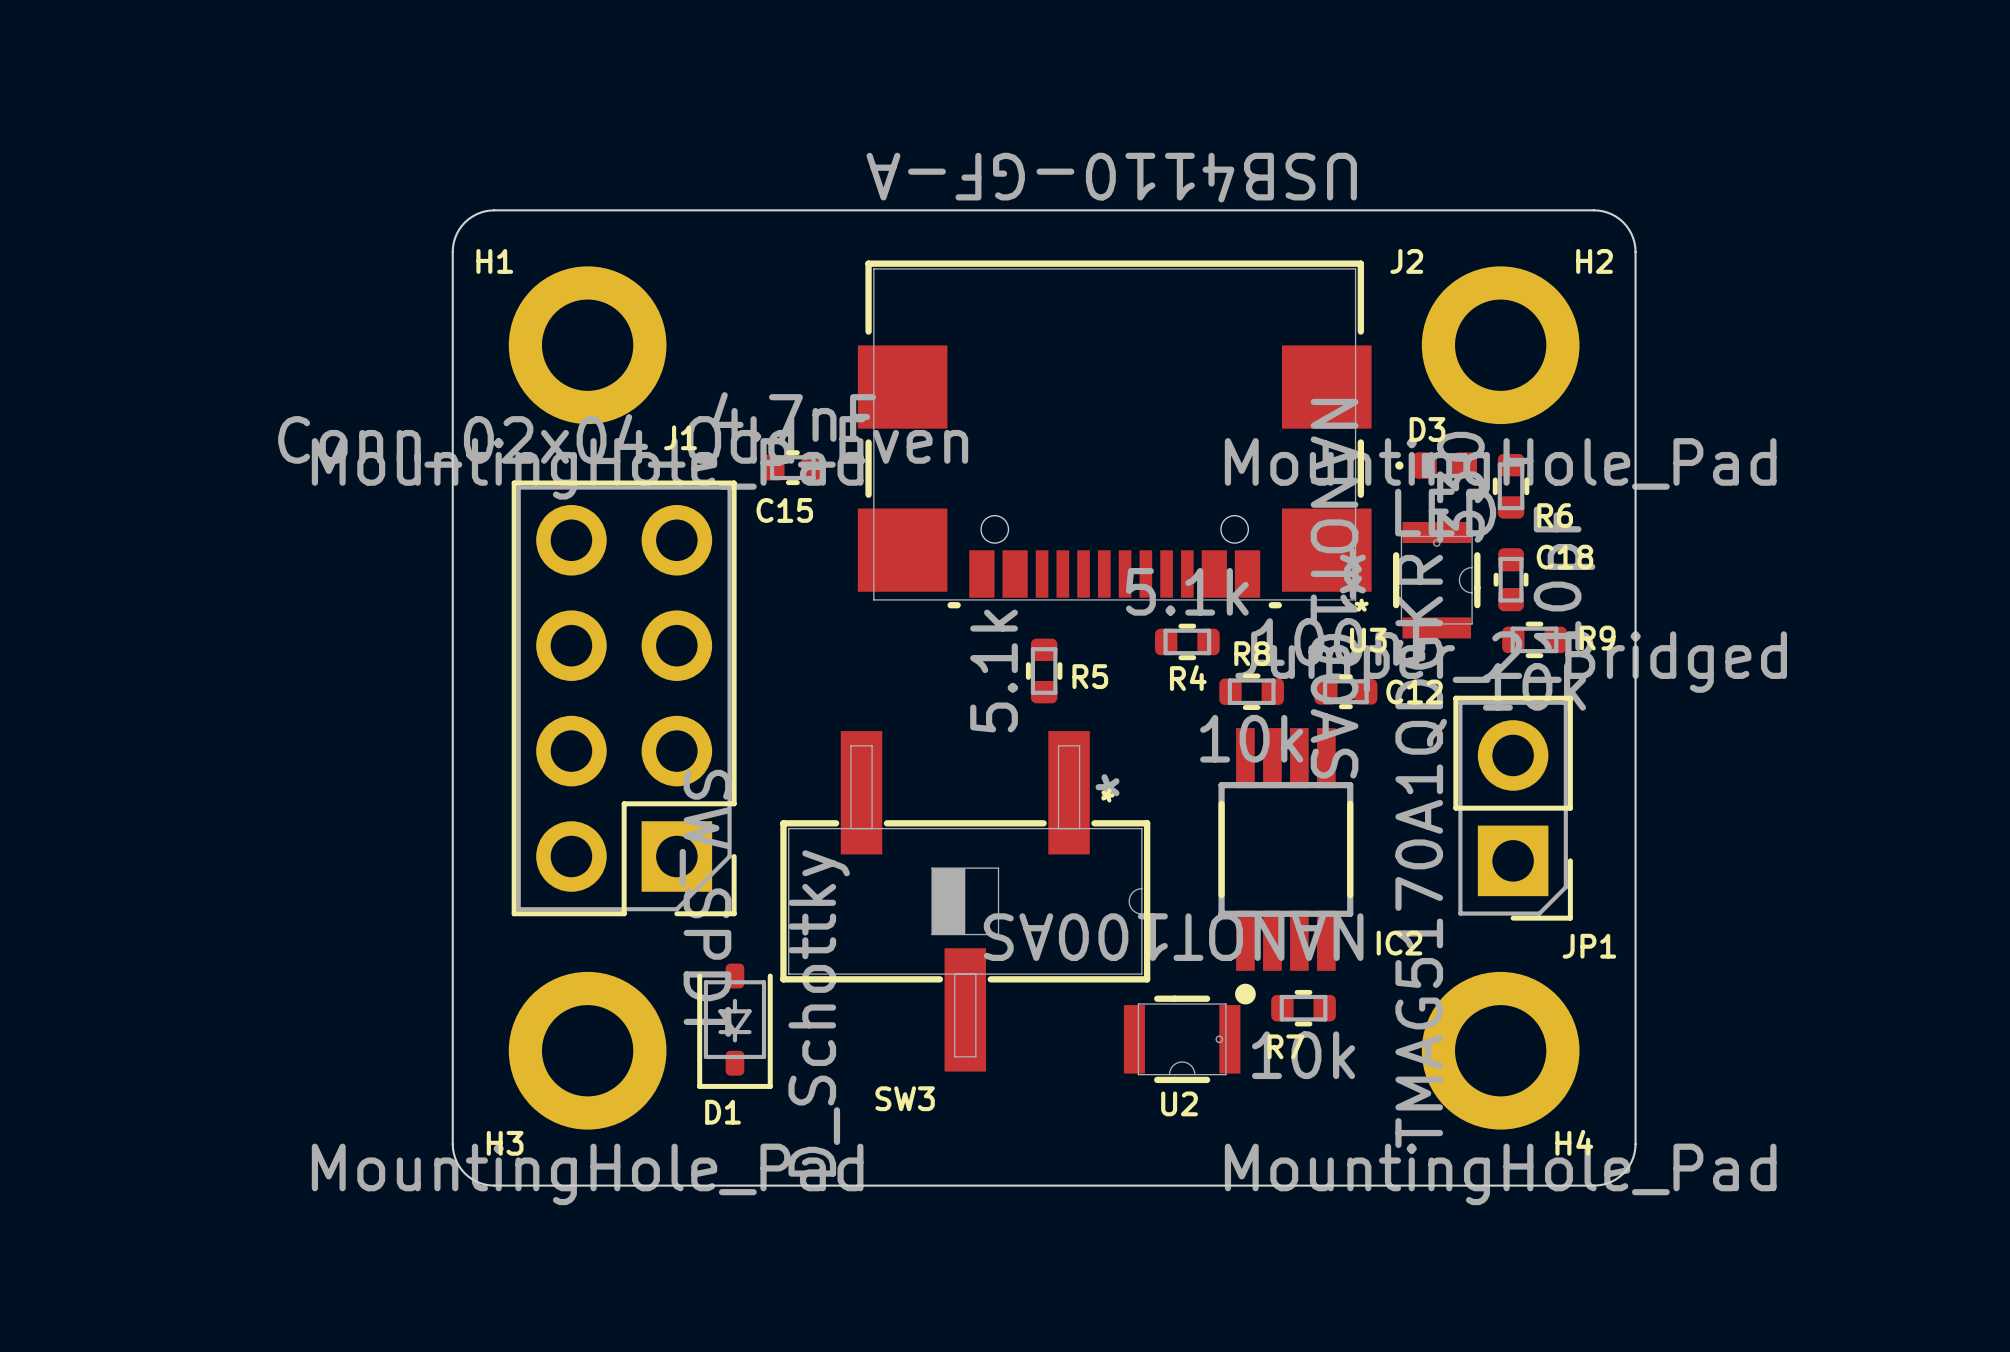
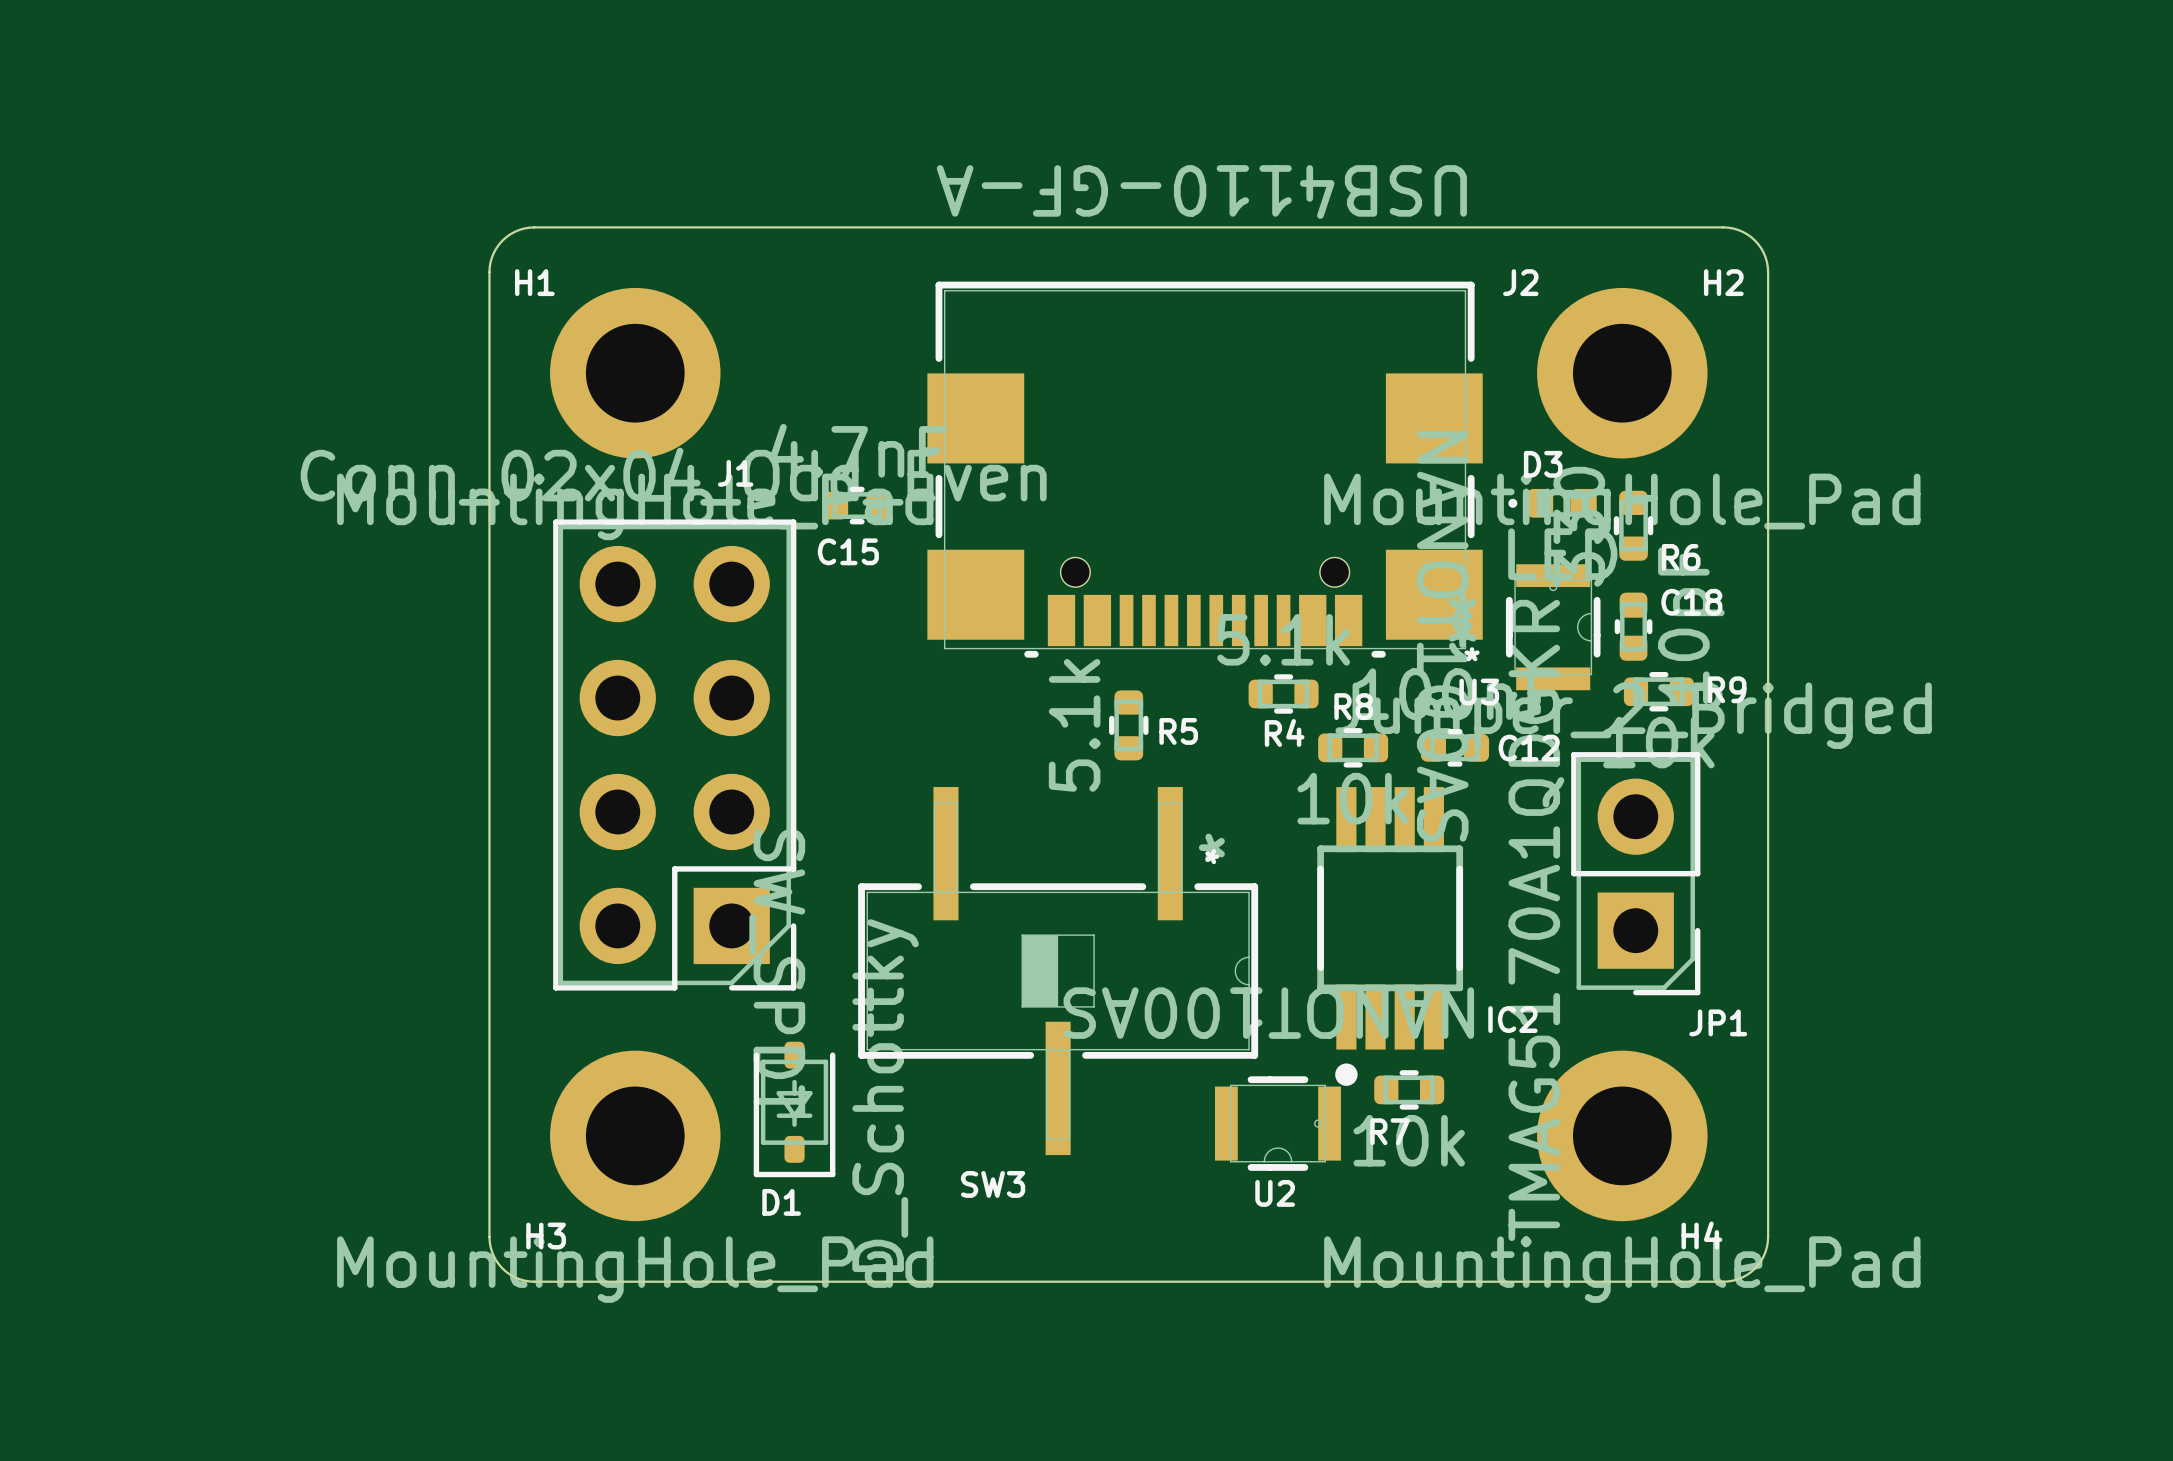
SW3 footprint: [780, 731, 1151, 1072] -> [858, 786, 1259, 1156]

